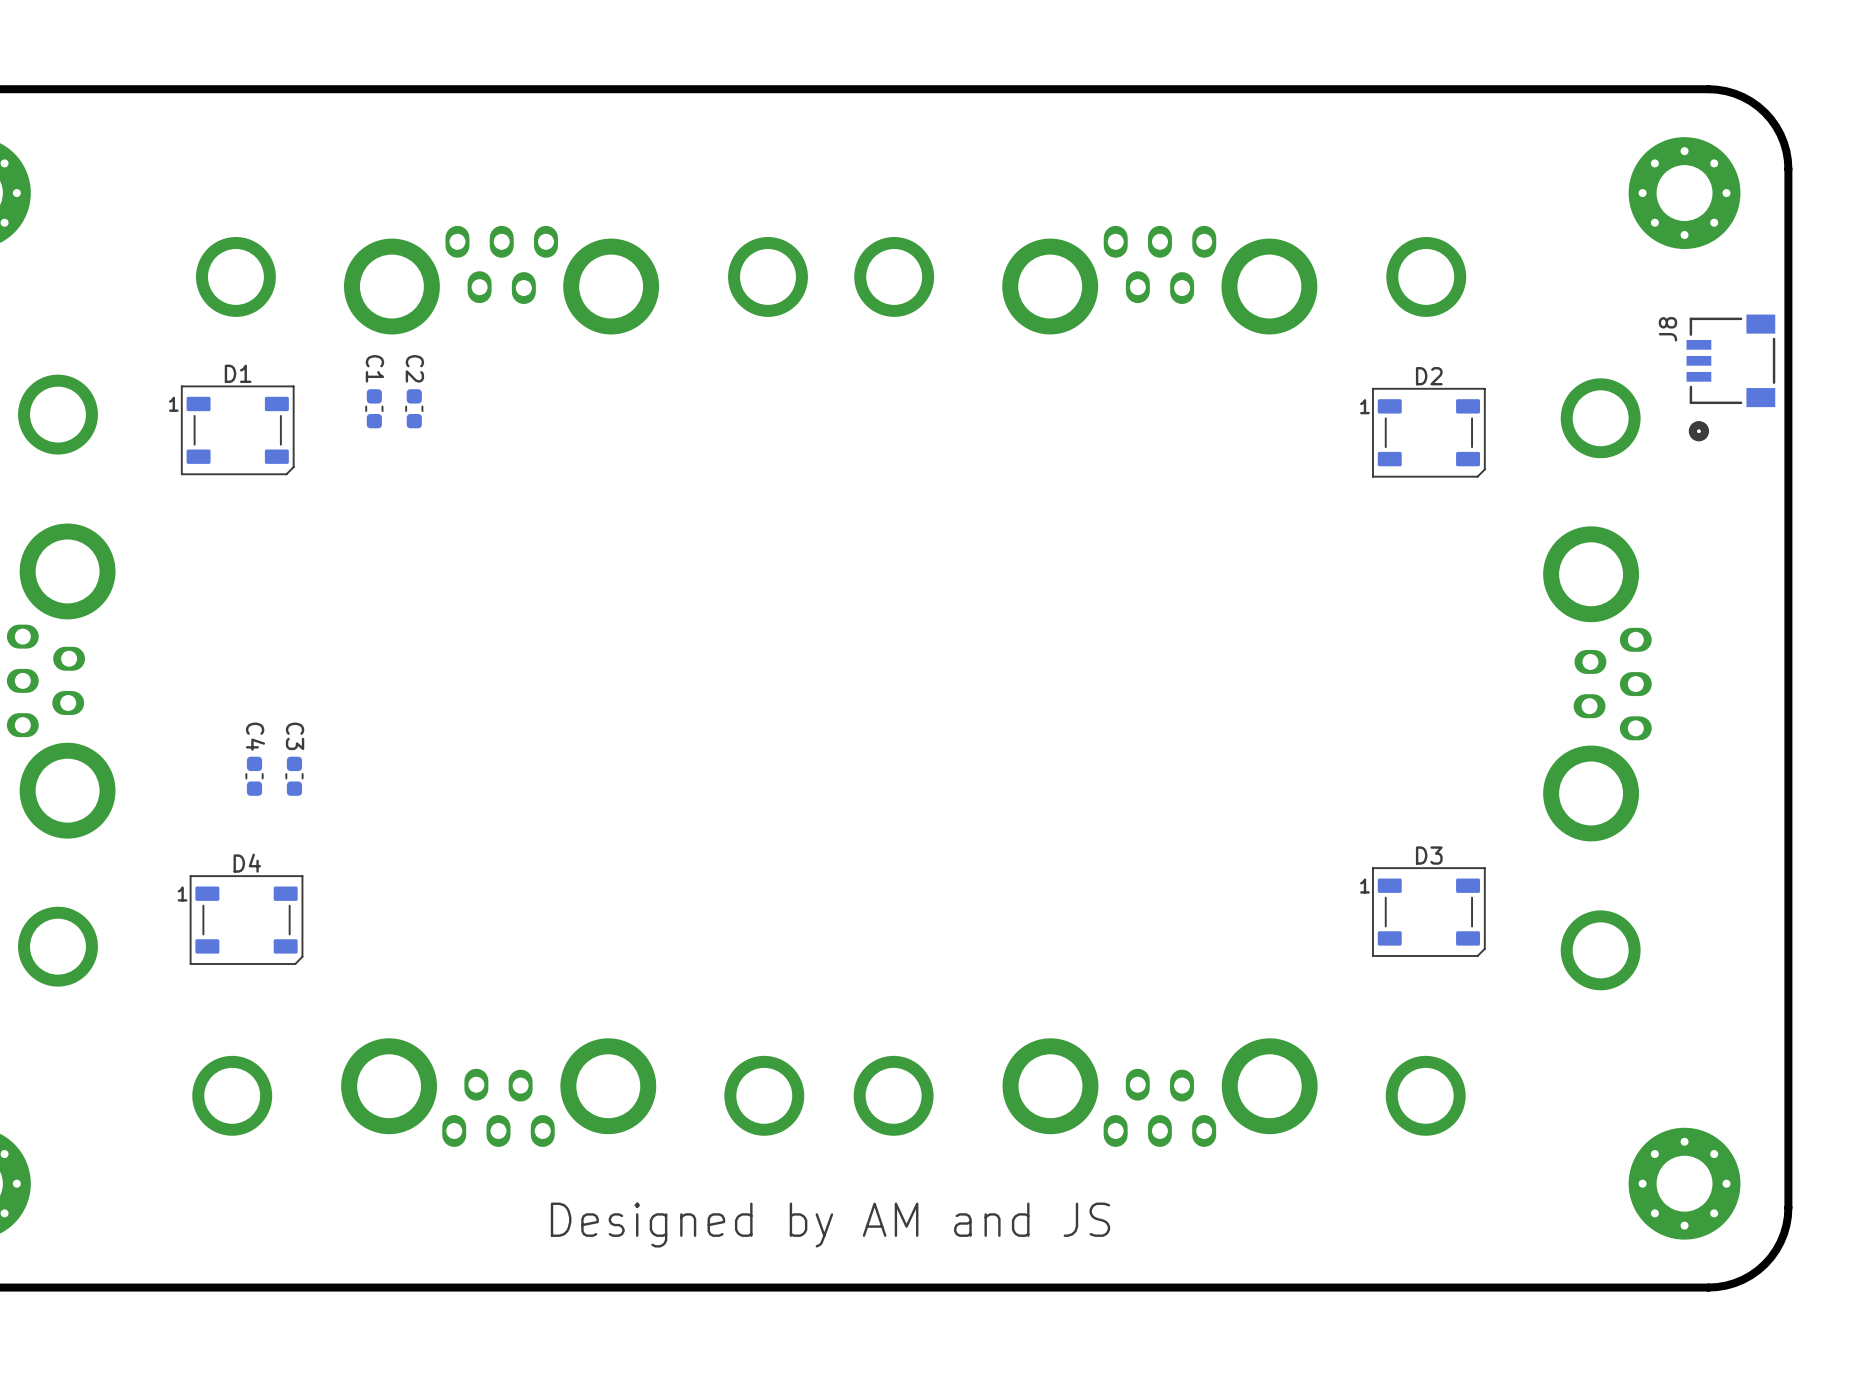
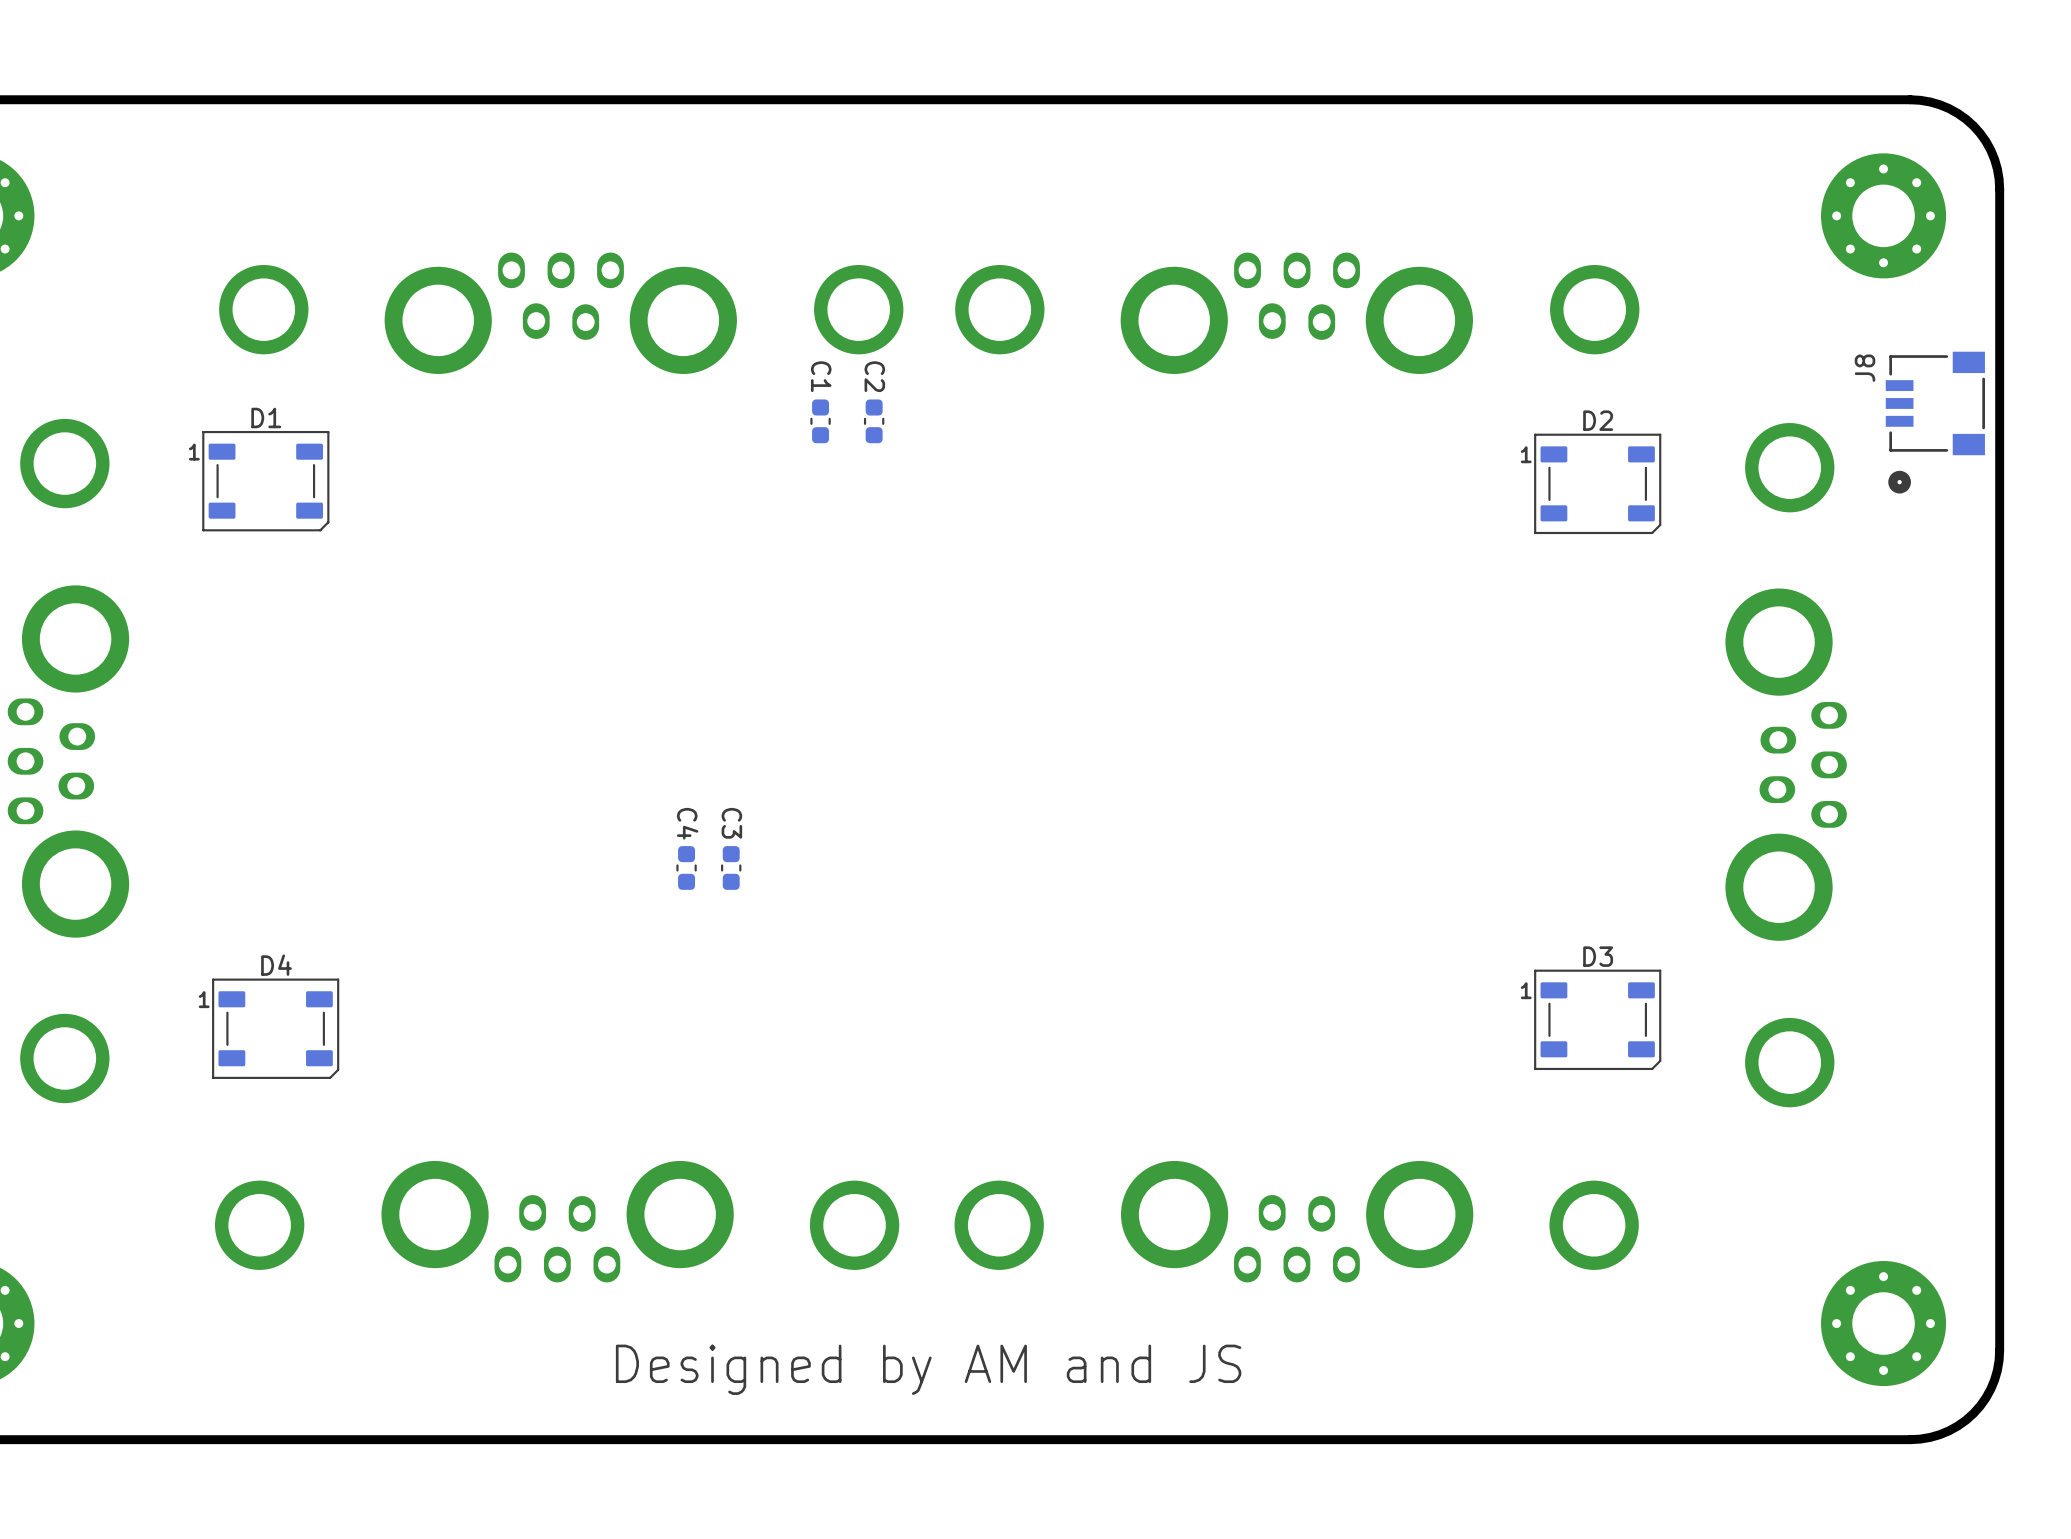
C1 position: (374, 408) -> (820, 421)
C2 position: (414, 408) -> (874, 421)
C4 position: (254, 776) -> (686, 867)
C3 position: (294, 776) -> (731, 867)

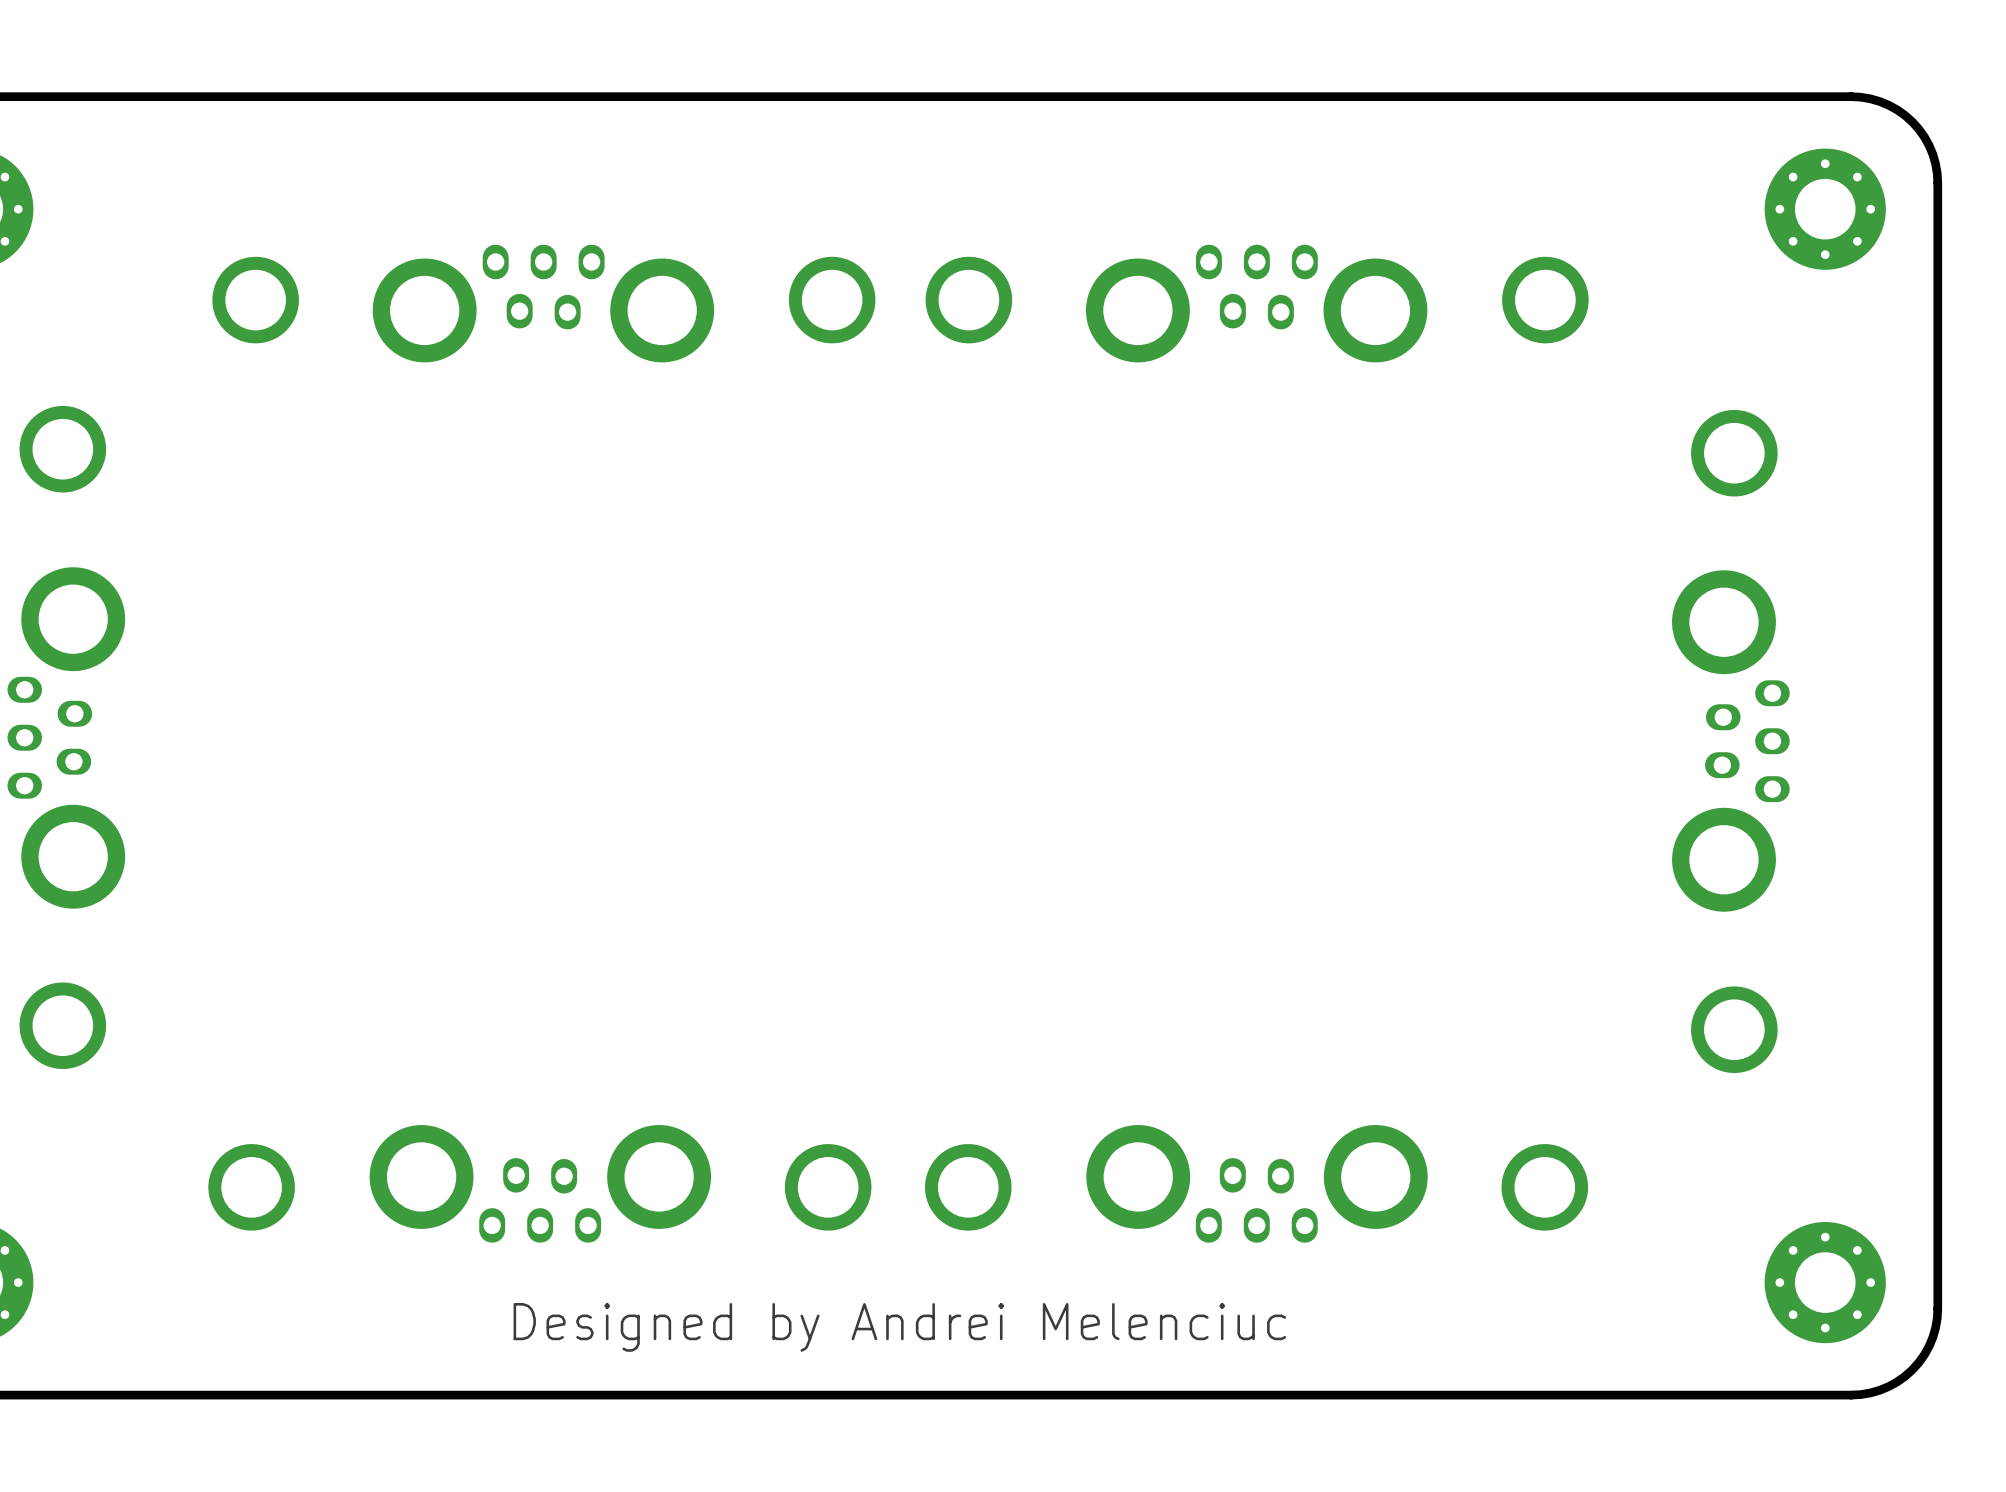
C1: (820, 421) -> none
C2: (874, 421) -> none
J8: (1935, 422) -> none
D1: (265, 481) -> none
D2: (1597, 483) -> none
C4: (686, 867) -> none
C3: (731, 867) -> none
D3: (1597, 1019) -> none
D4: (275, 1028) -> none
text: Designed by AM and JS (928, 1369) -> Designed by Andrei Melenciuc (899, 1327)

